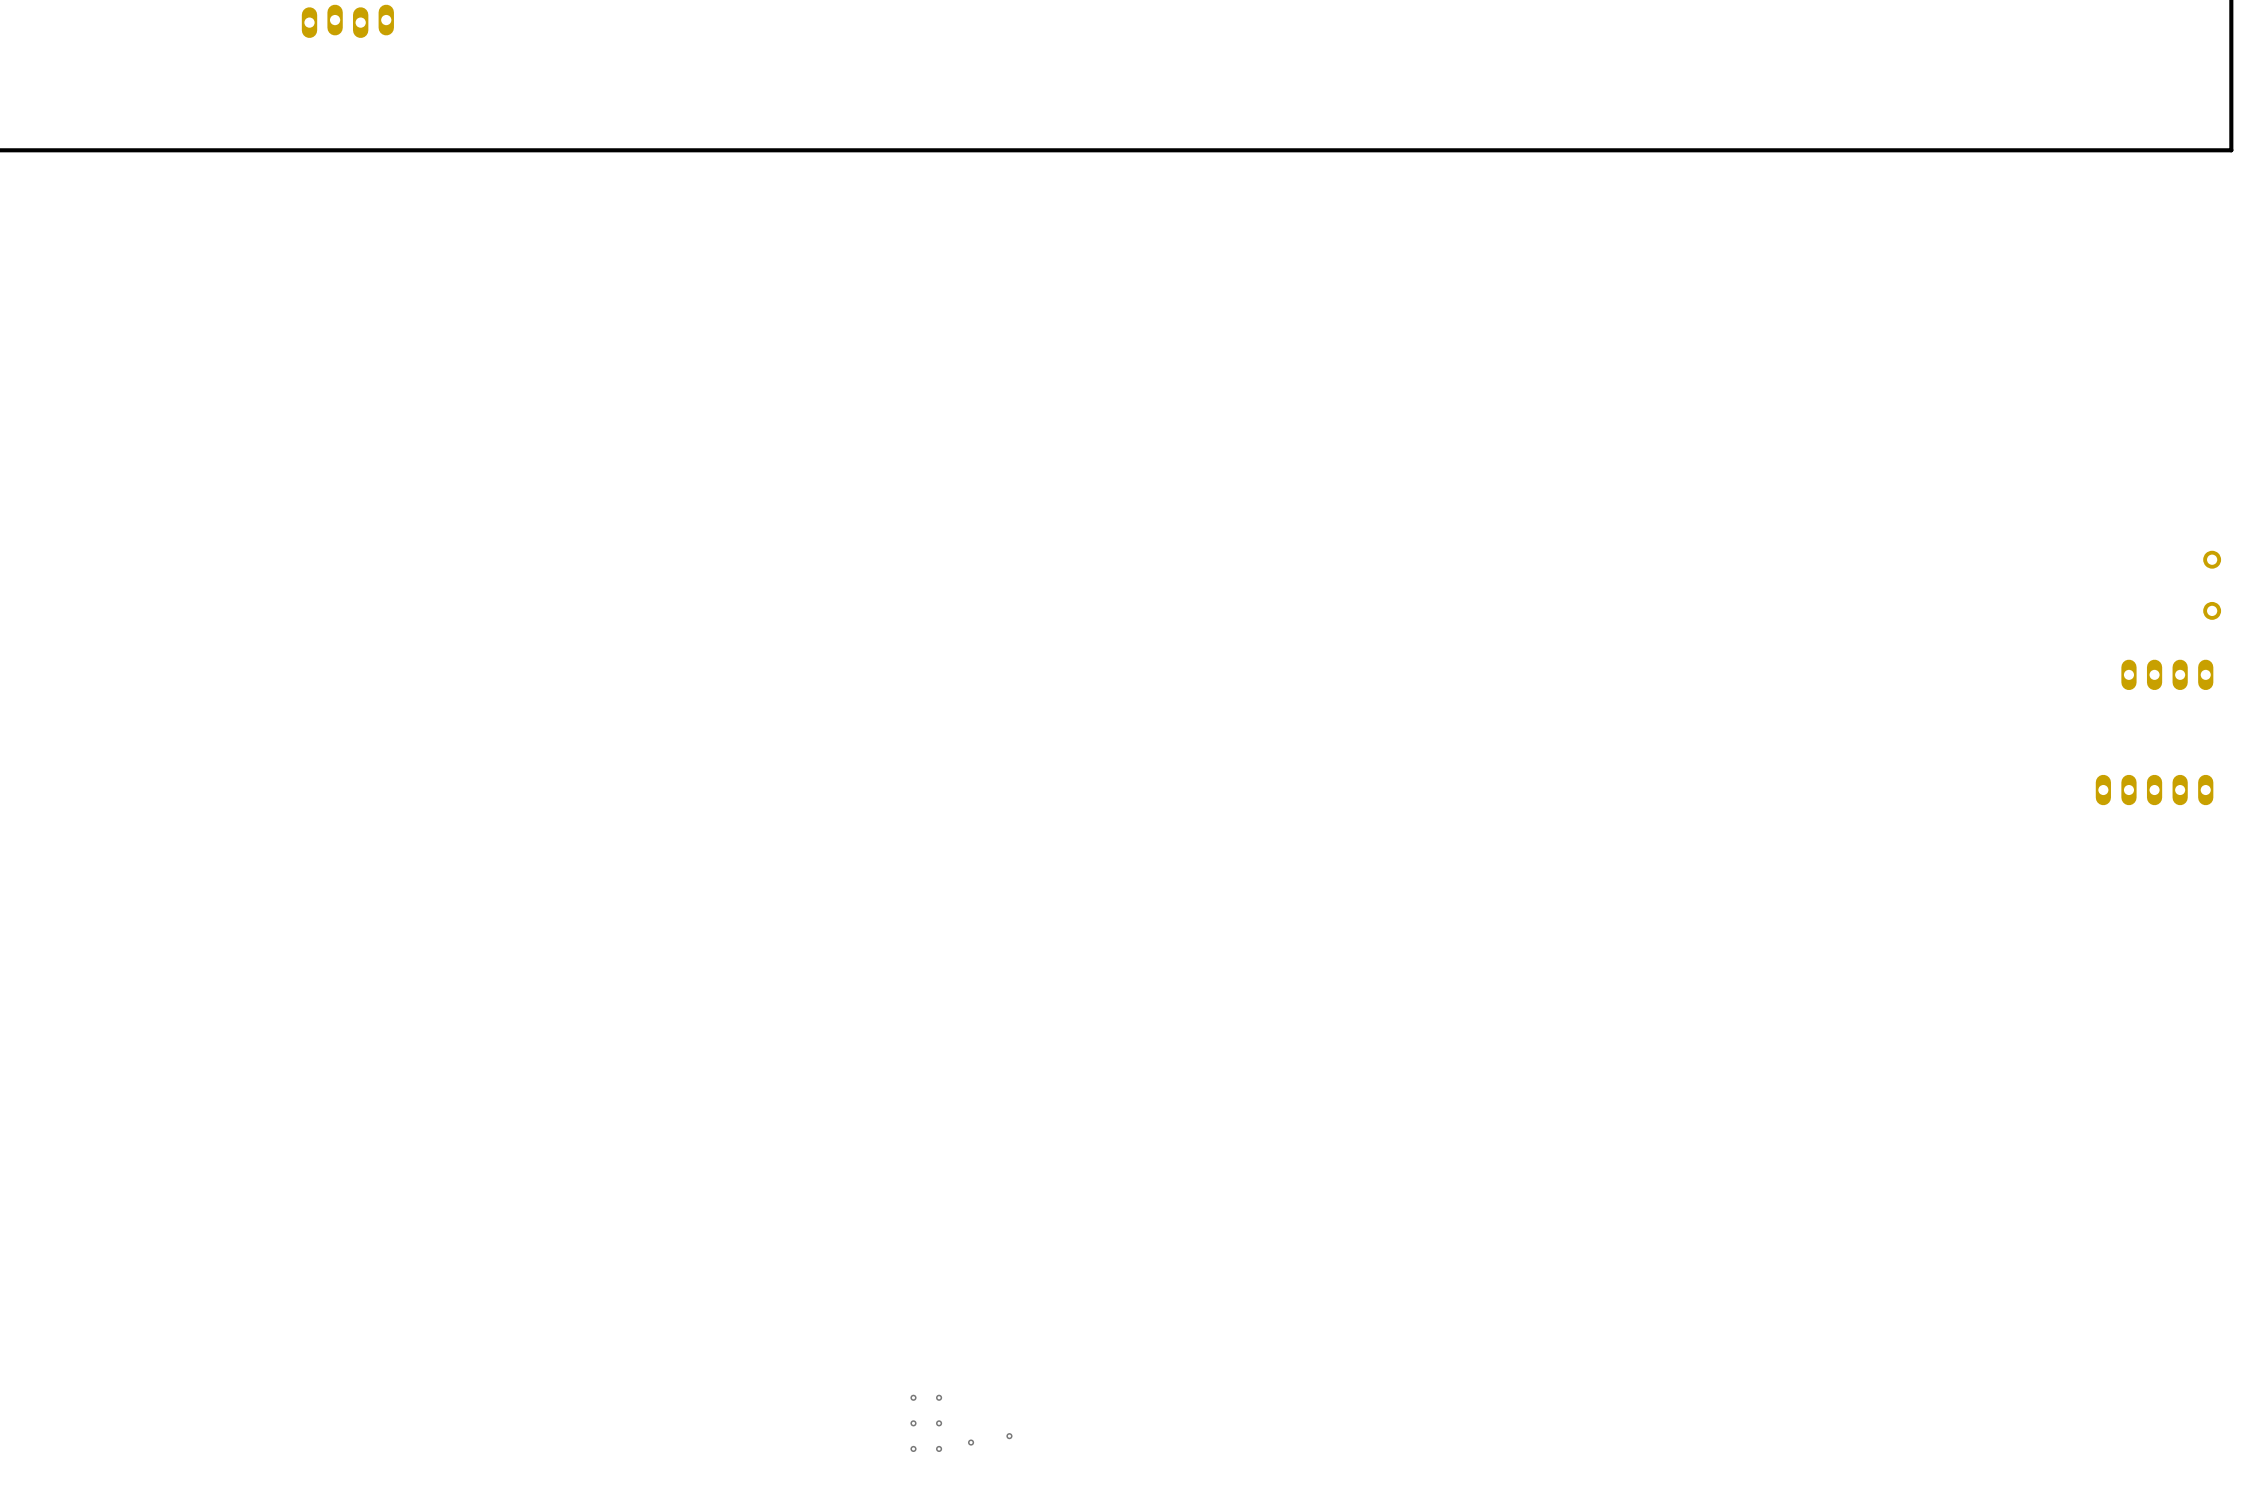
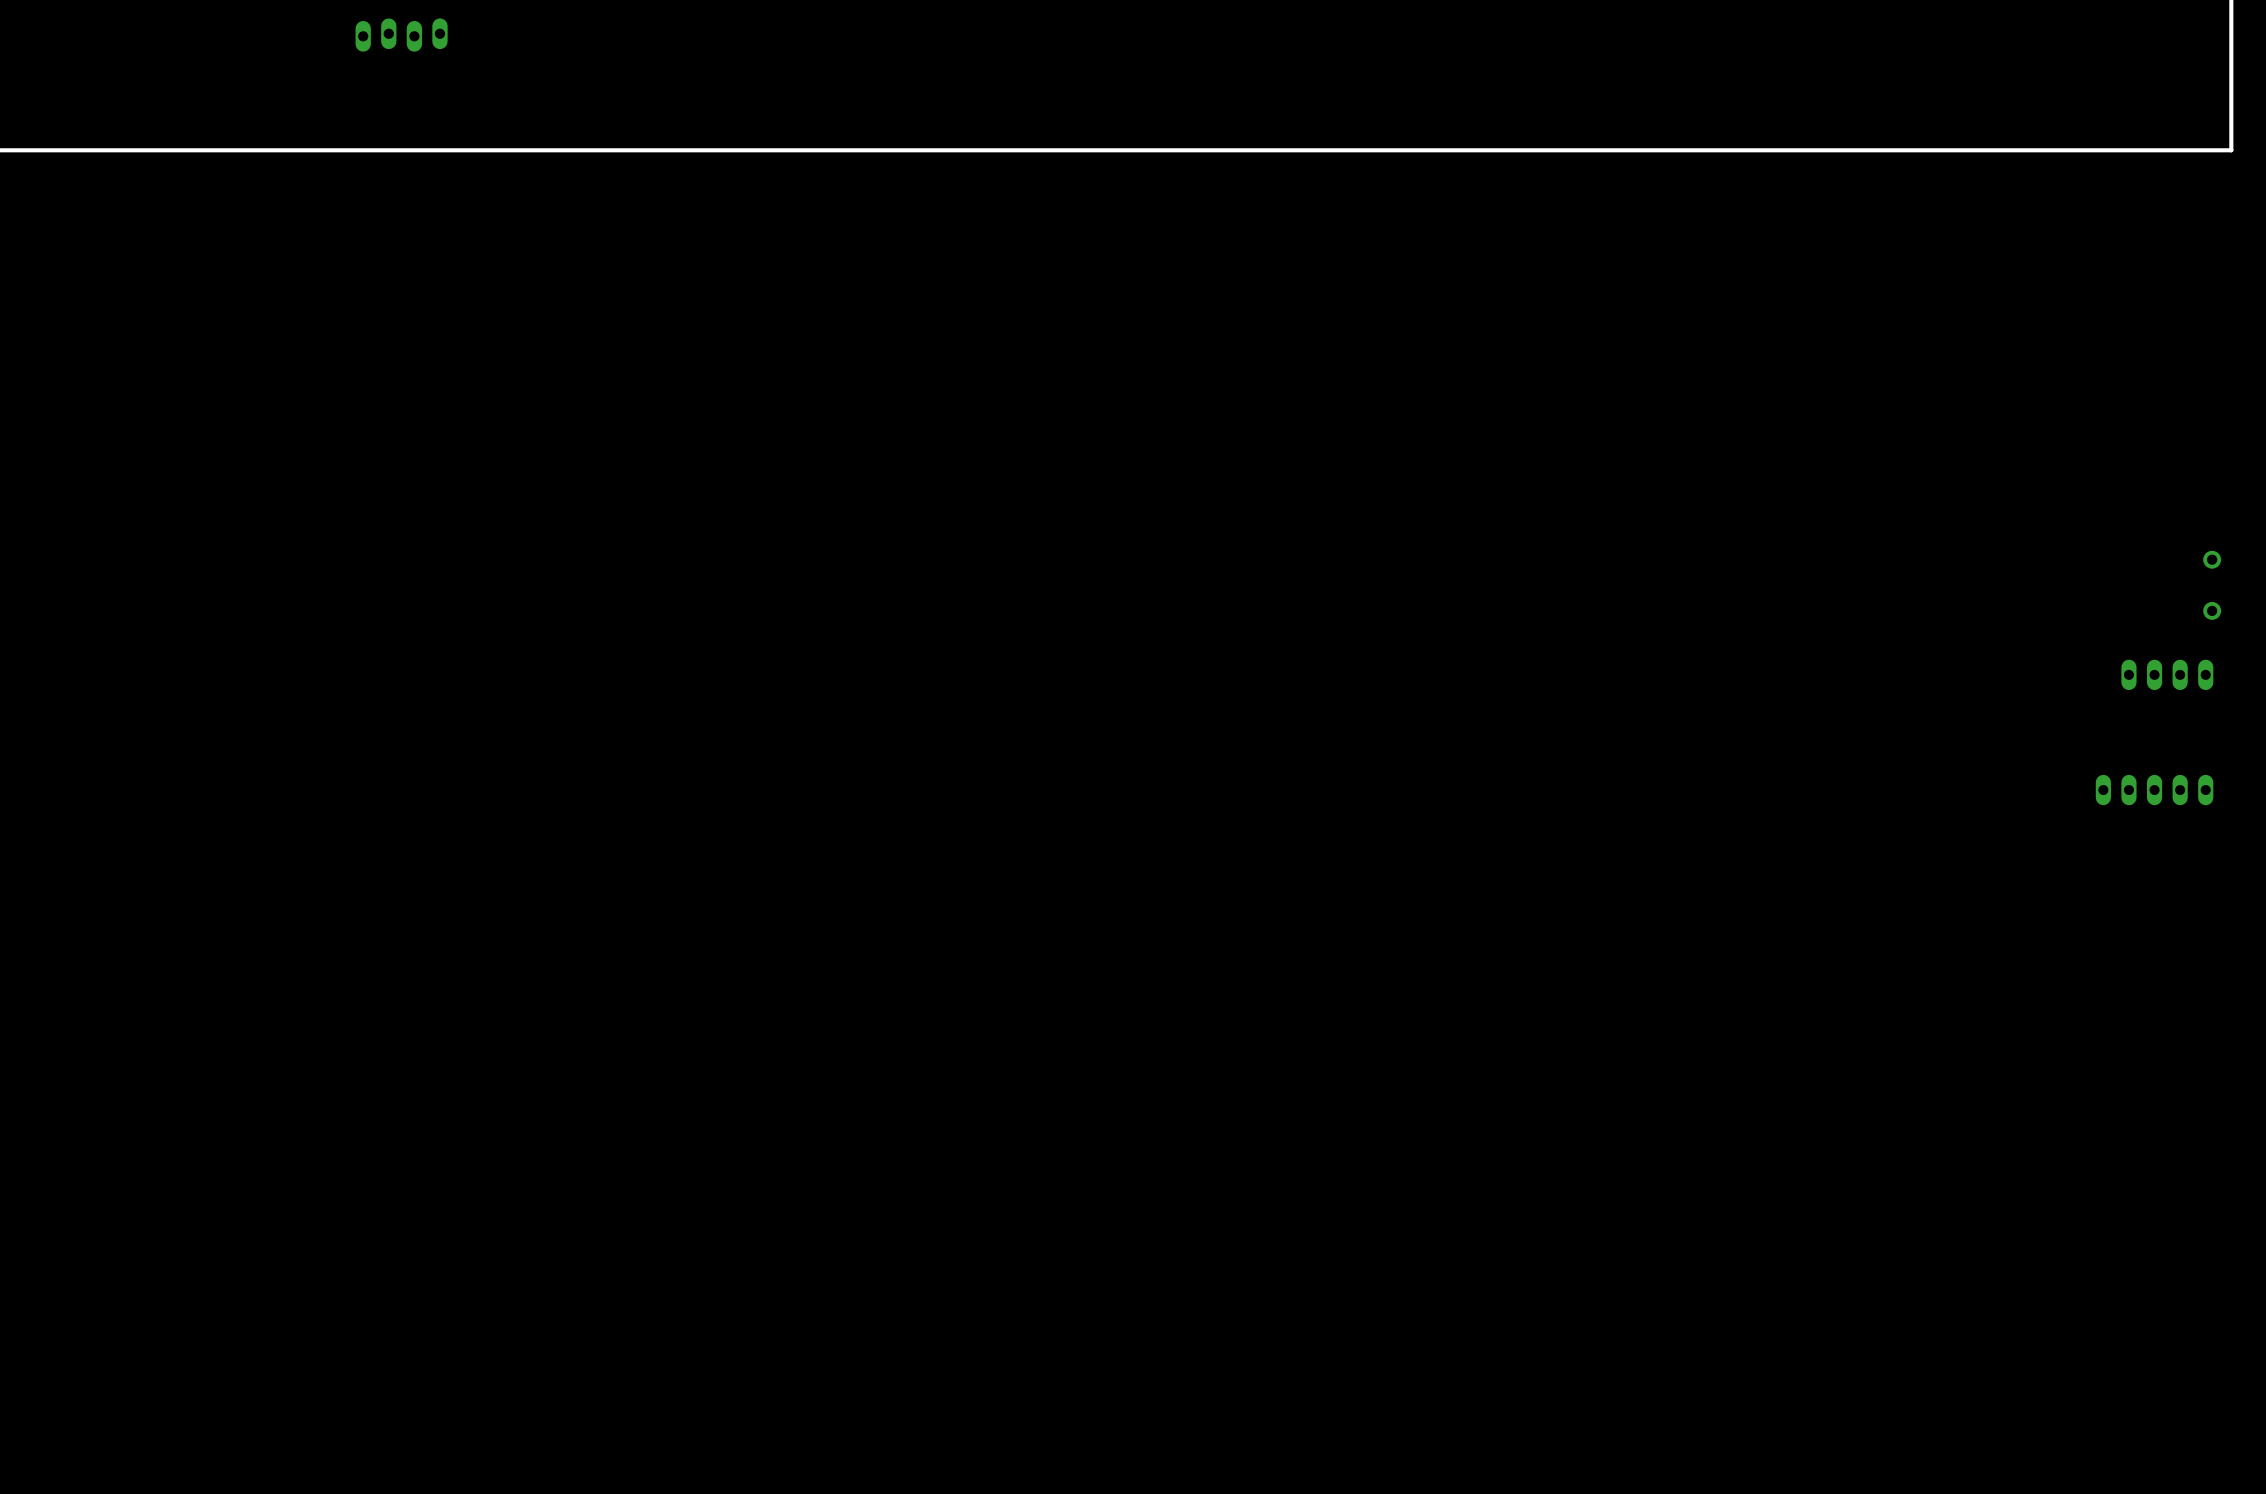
part position: (347, 21) -> (401, 35)
via: (913, 1397) -> none
via: (939, 1397) -> none
via: (913, 1423) -> none
via: (939, 1423) -> none
via: (1009, 1436) -> none
via: (971, 1442) -> none
via: (913, 1448) -> none
via: (939, 1448) -> none

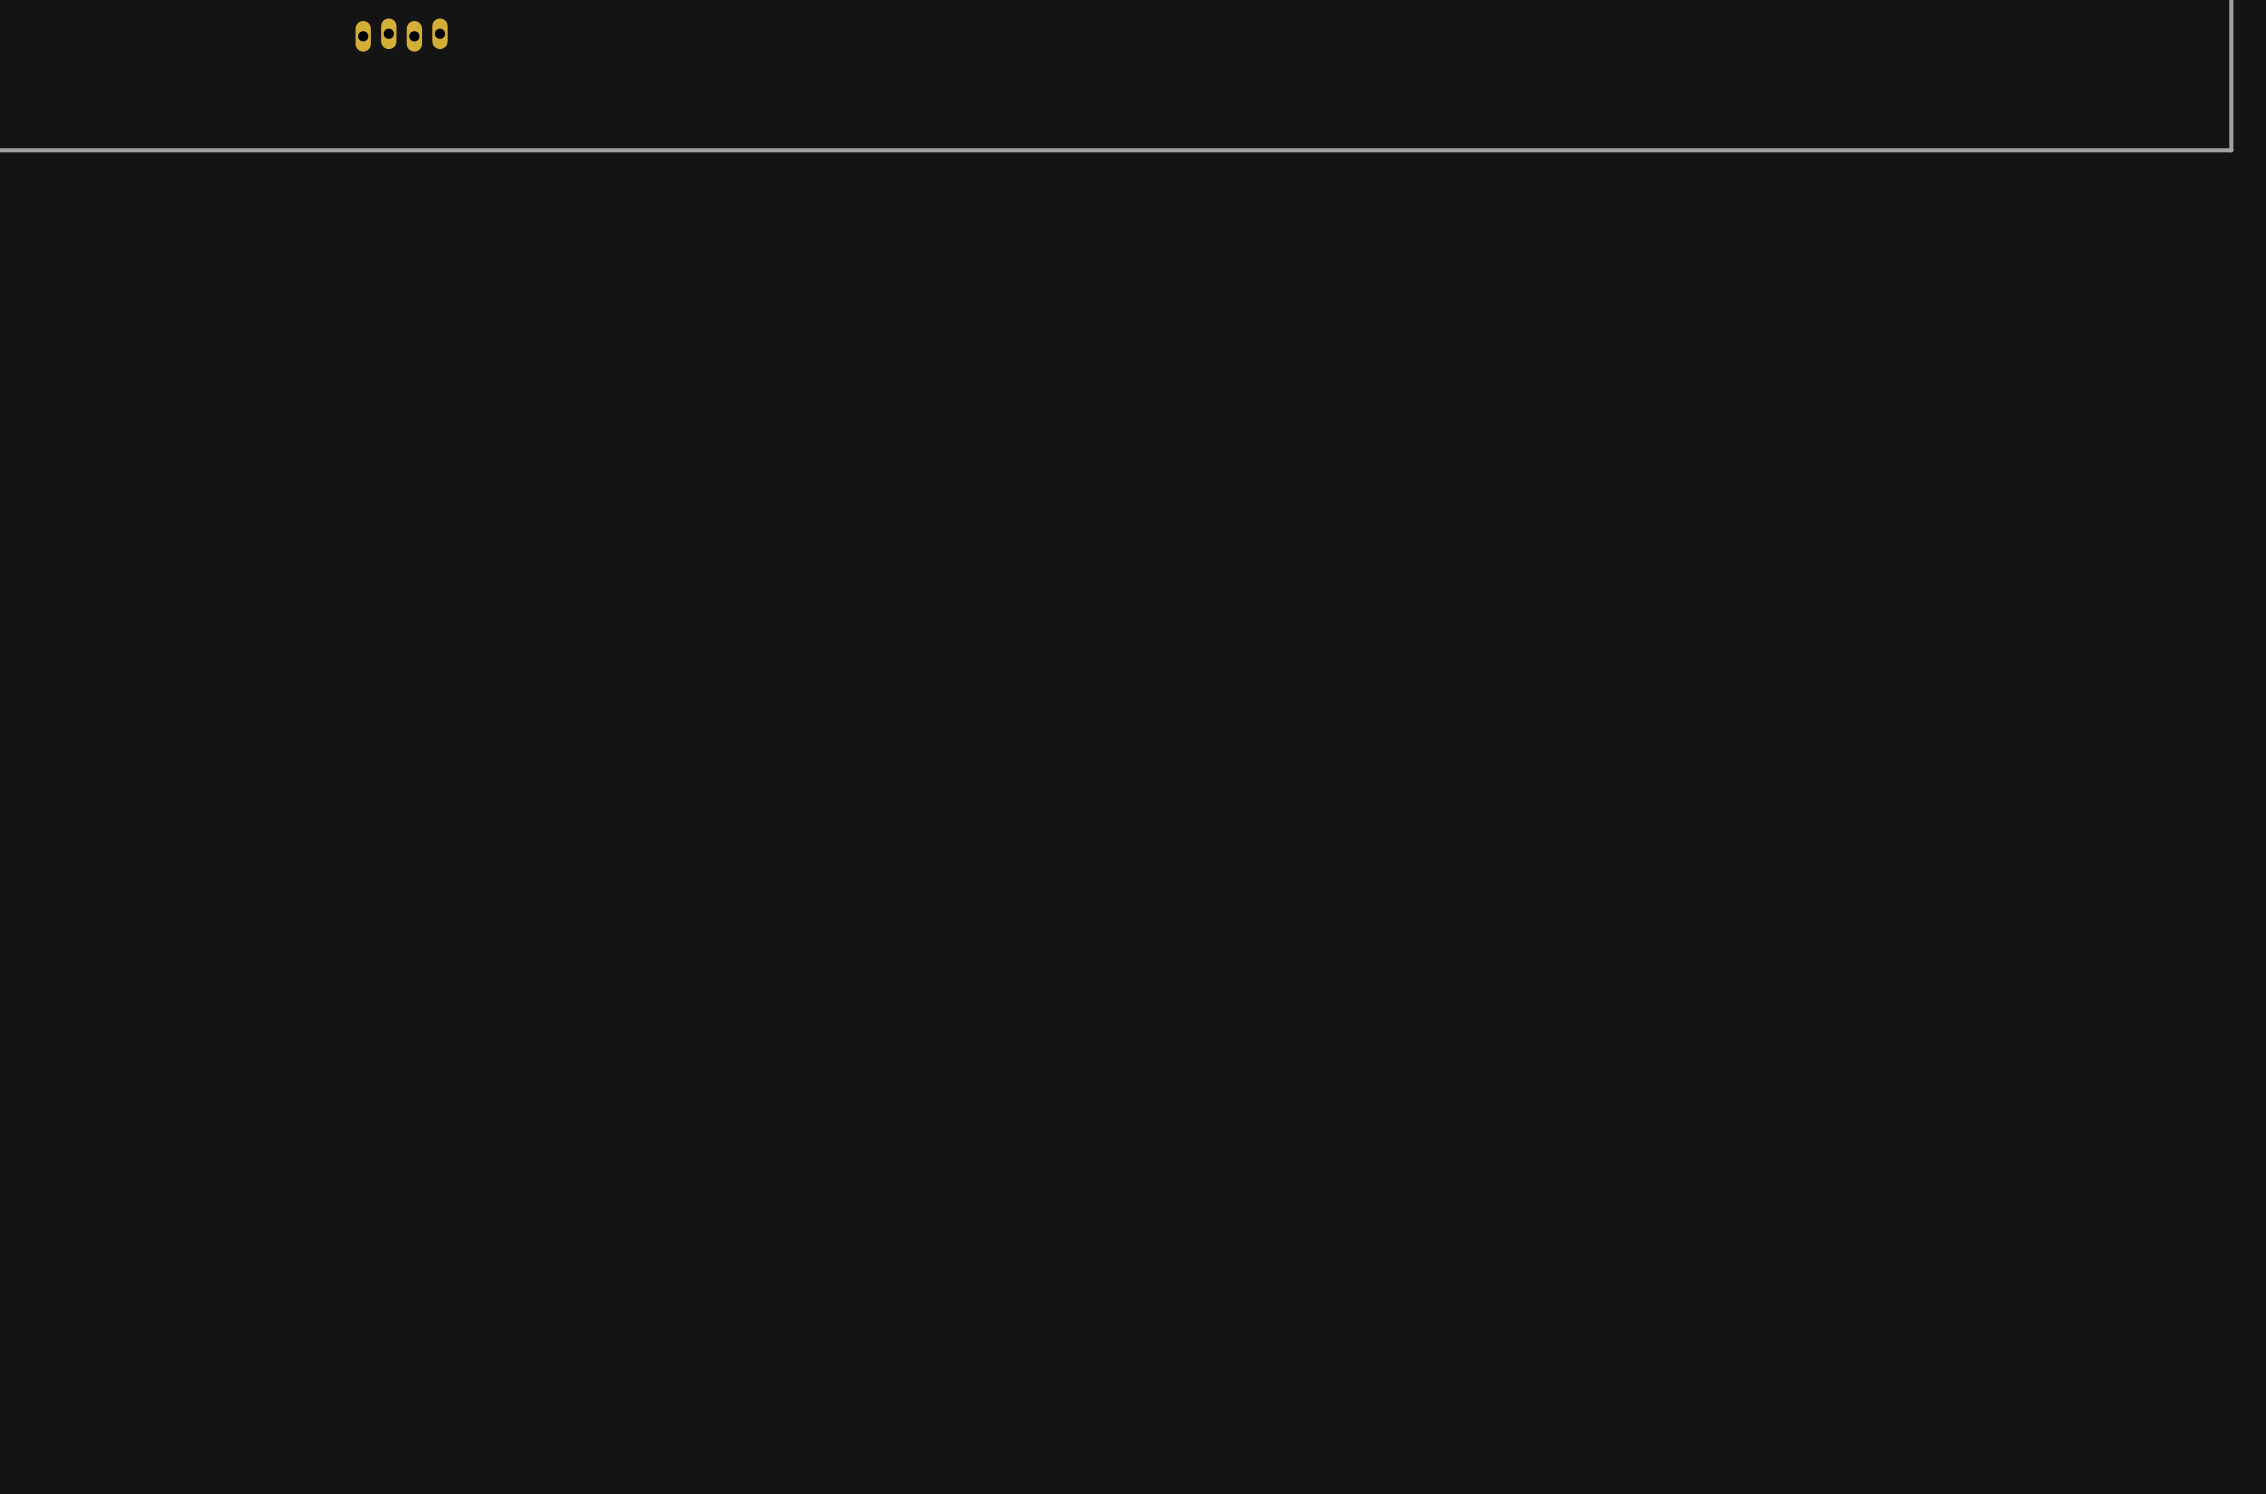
part: (2212, 559) -> none
part: (2212, 610) -> none
part: (2167, 674) -> none
part: (2154, 790) -> none

